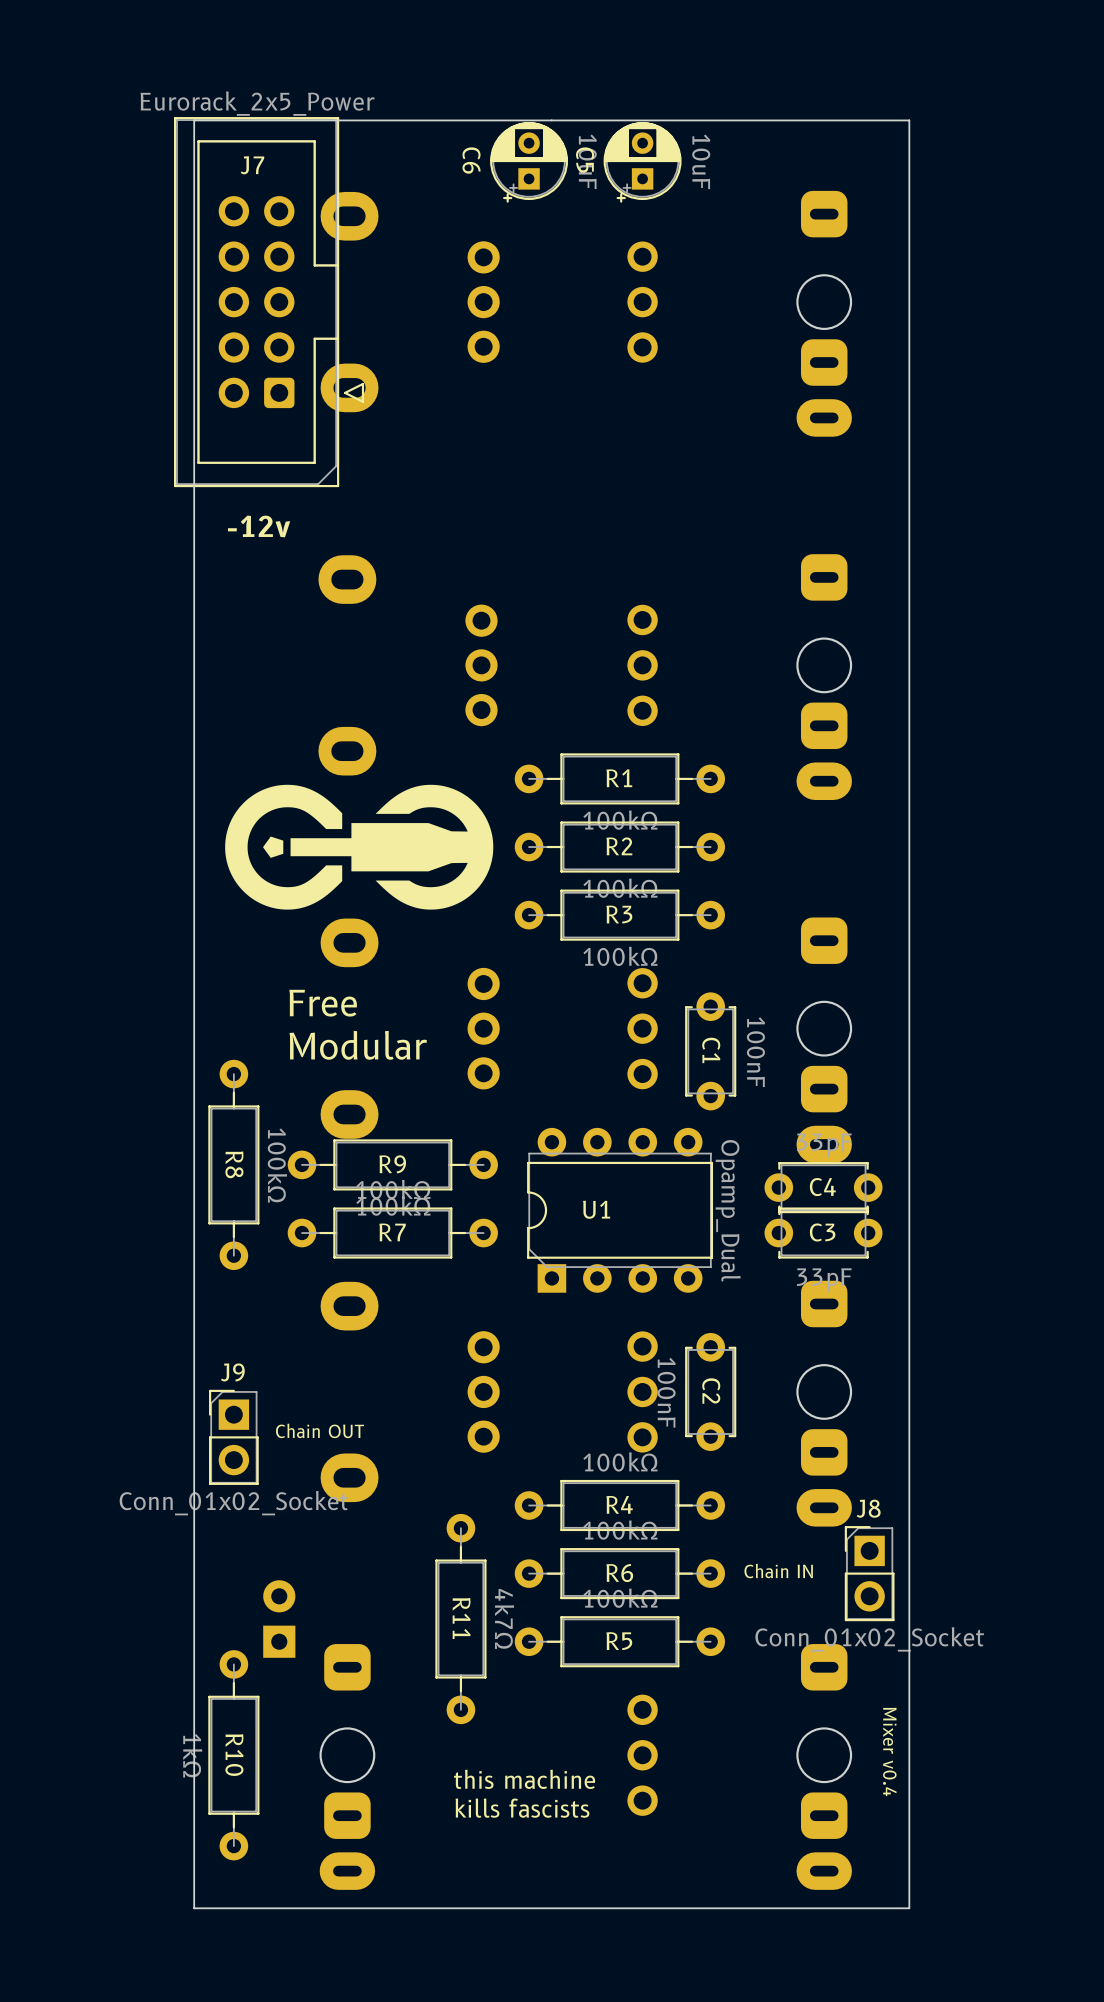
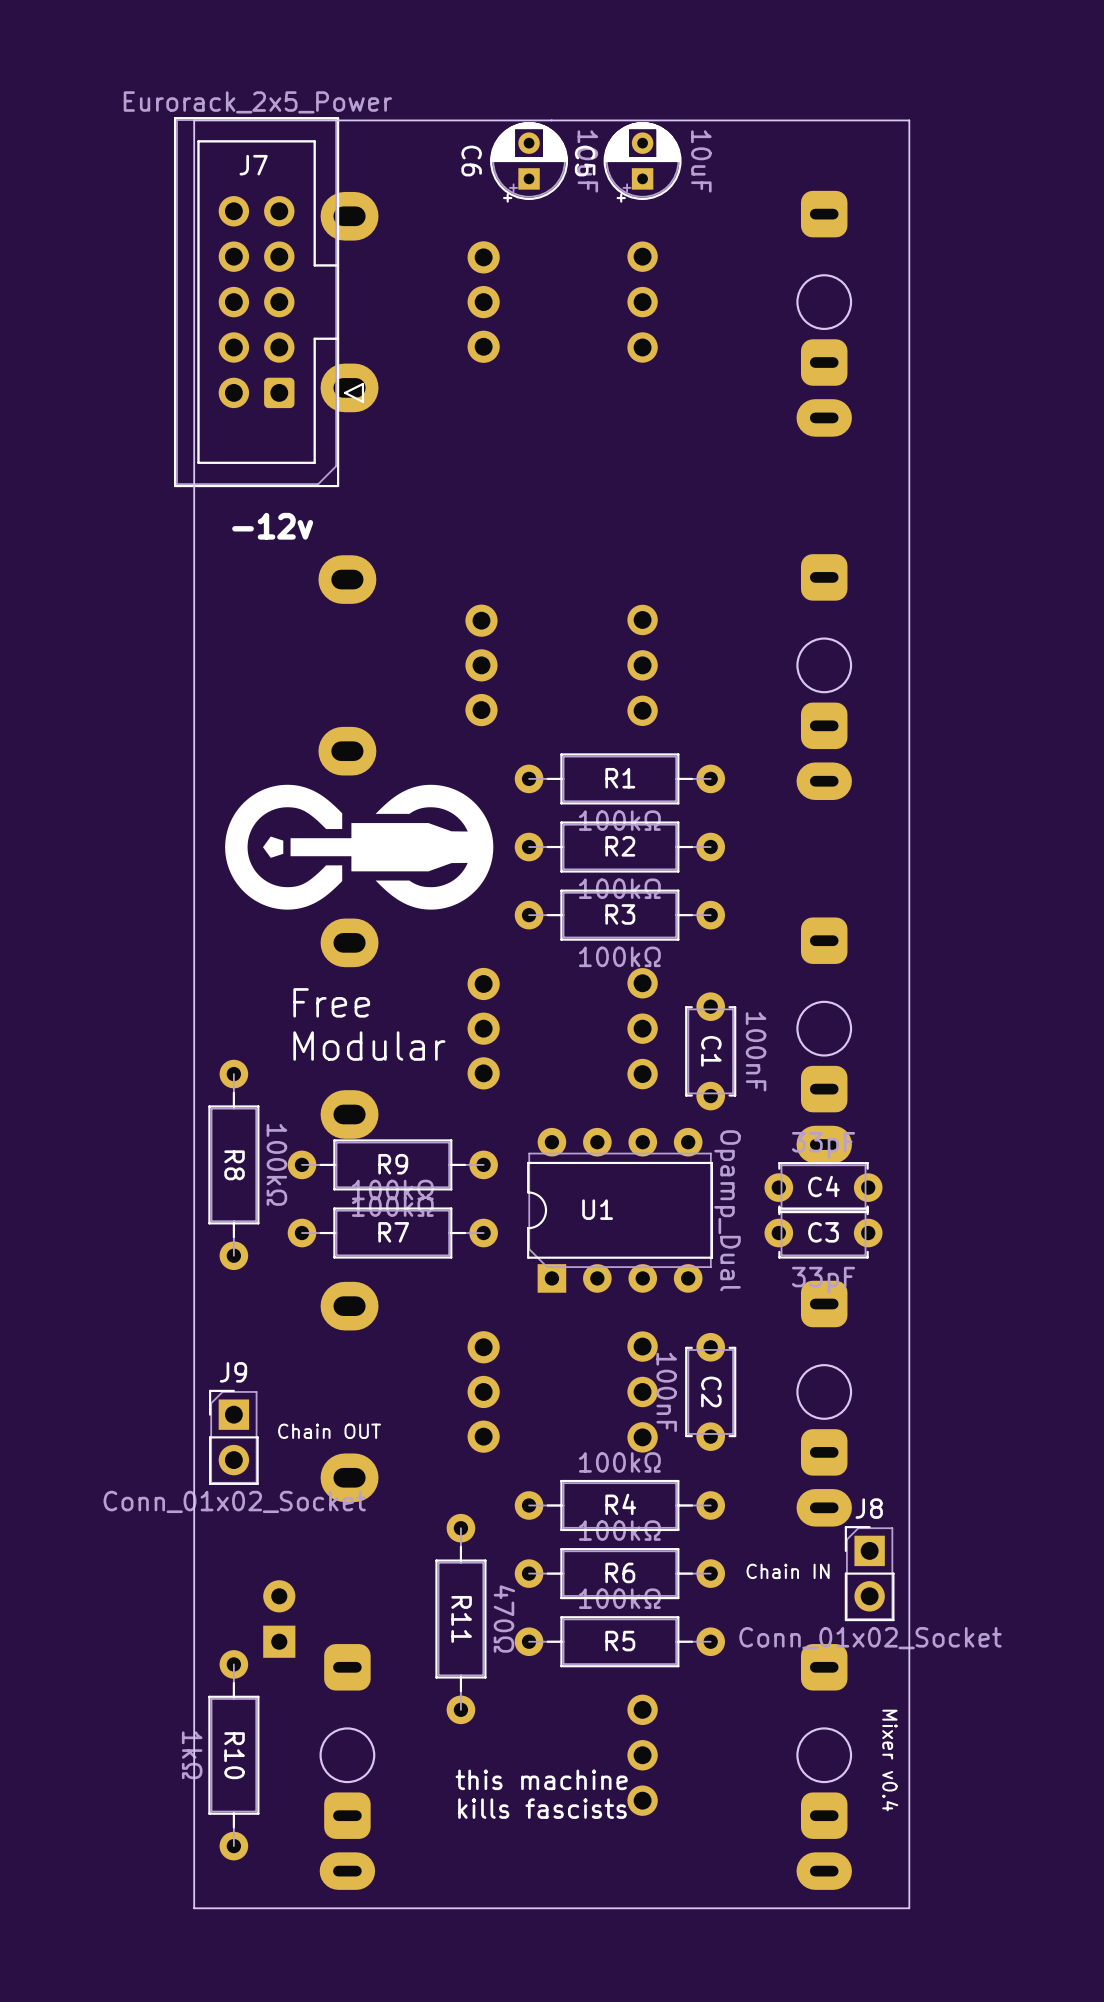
R11 value: 4k7Ω (504, 1619) -> 470Ω (504, 1619)

